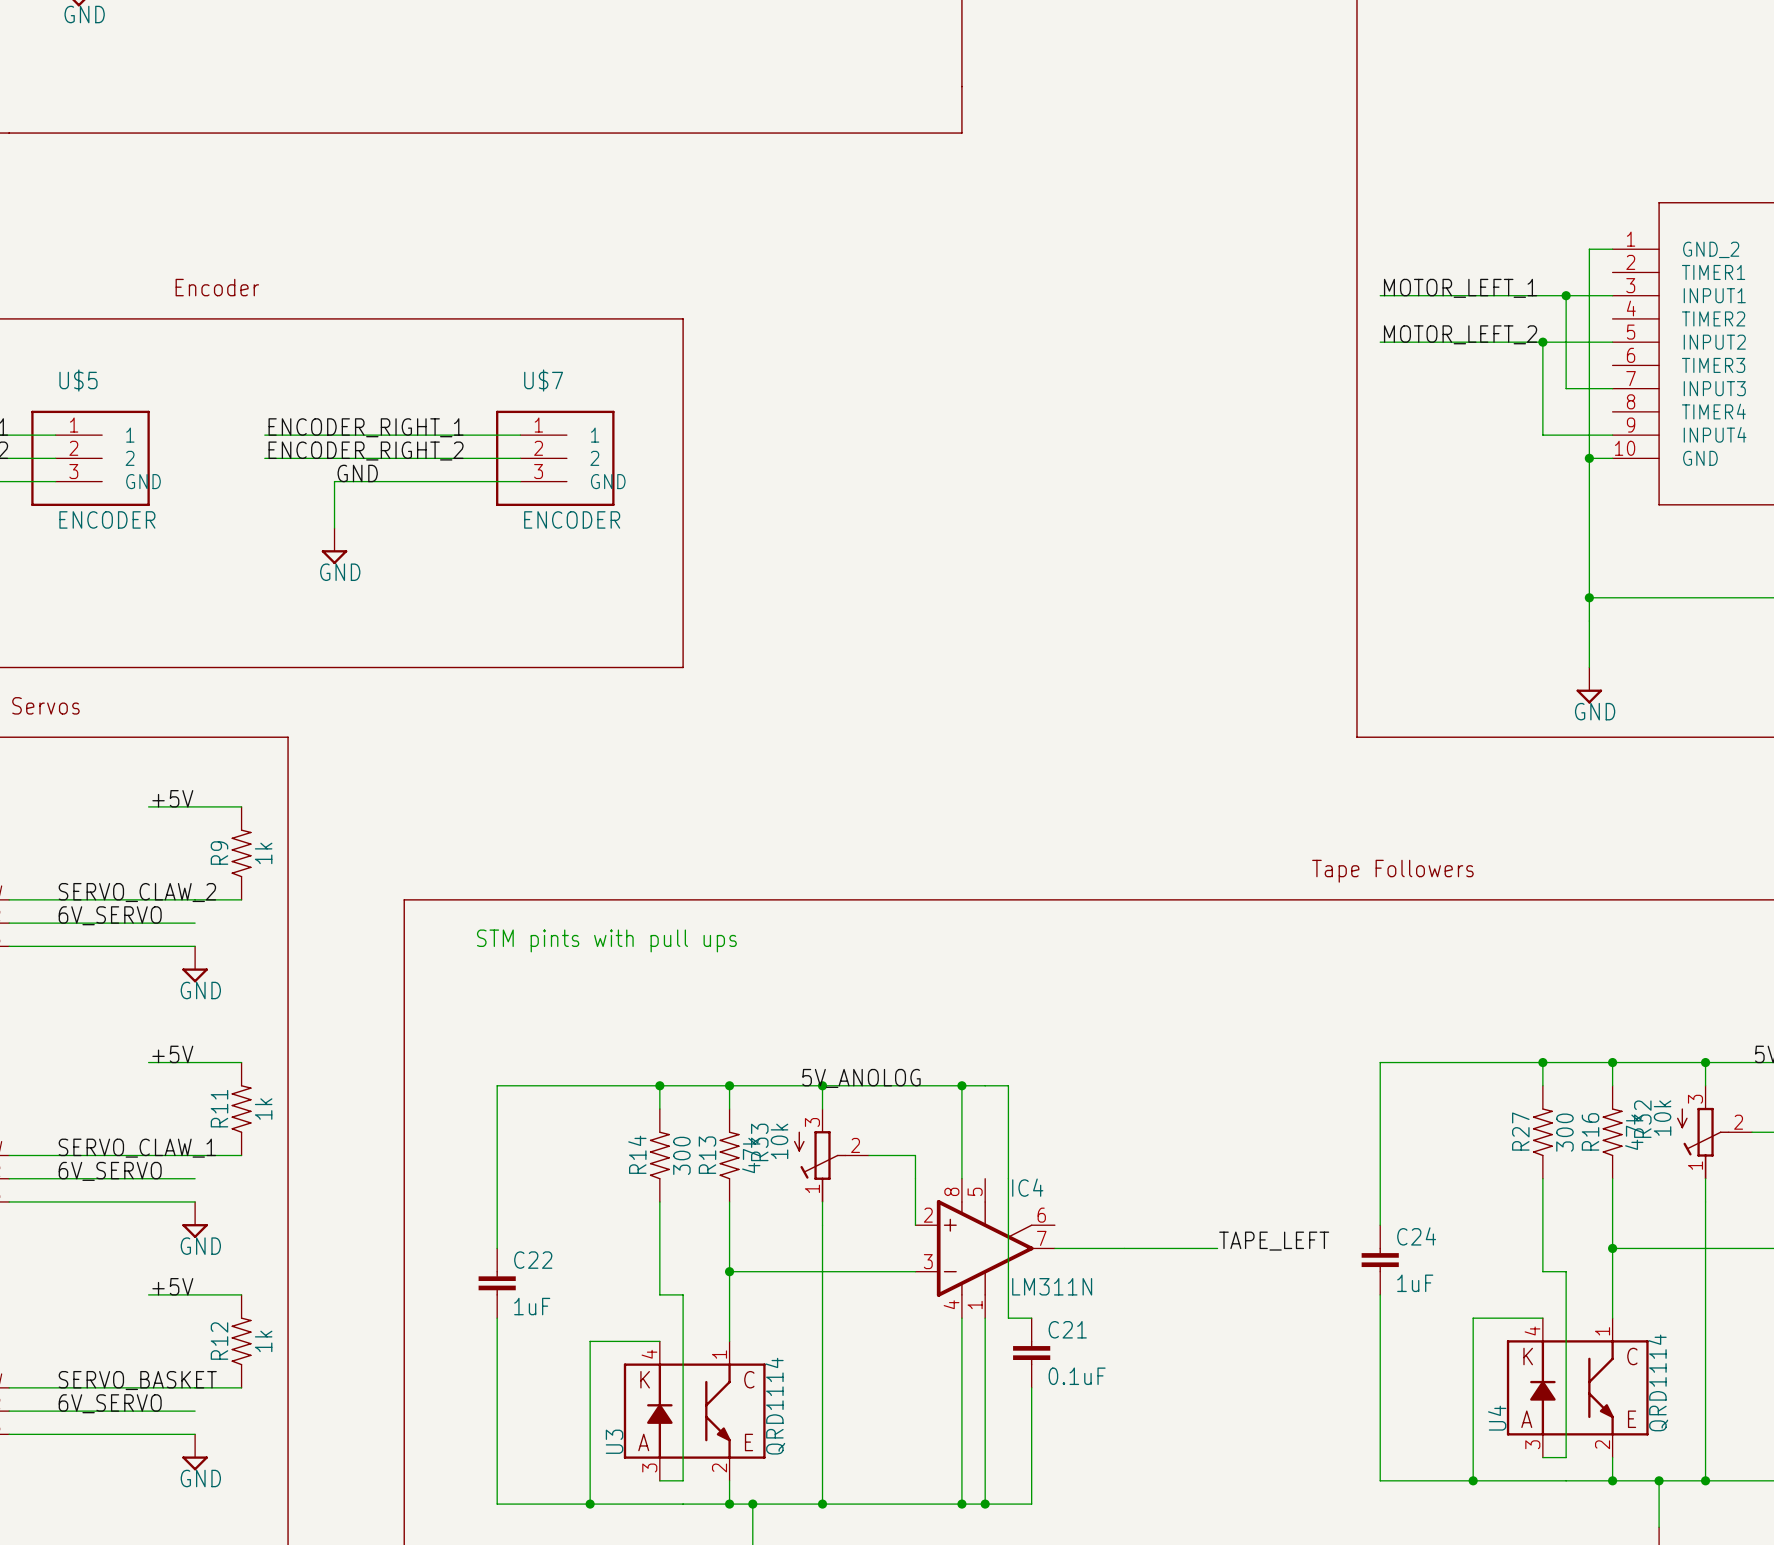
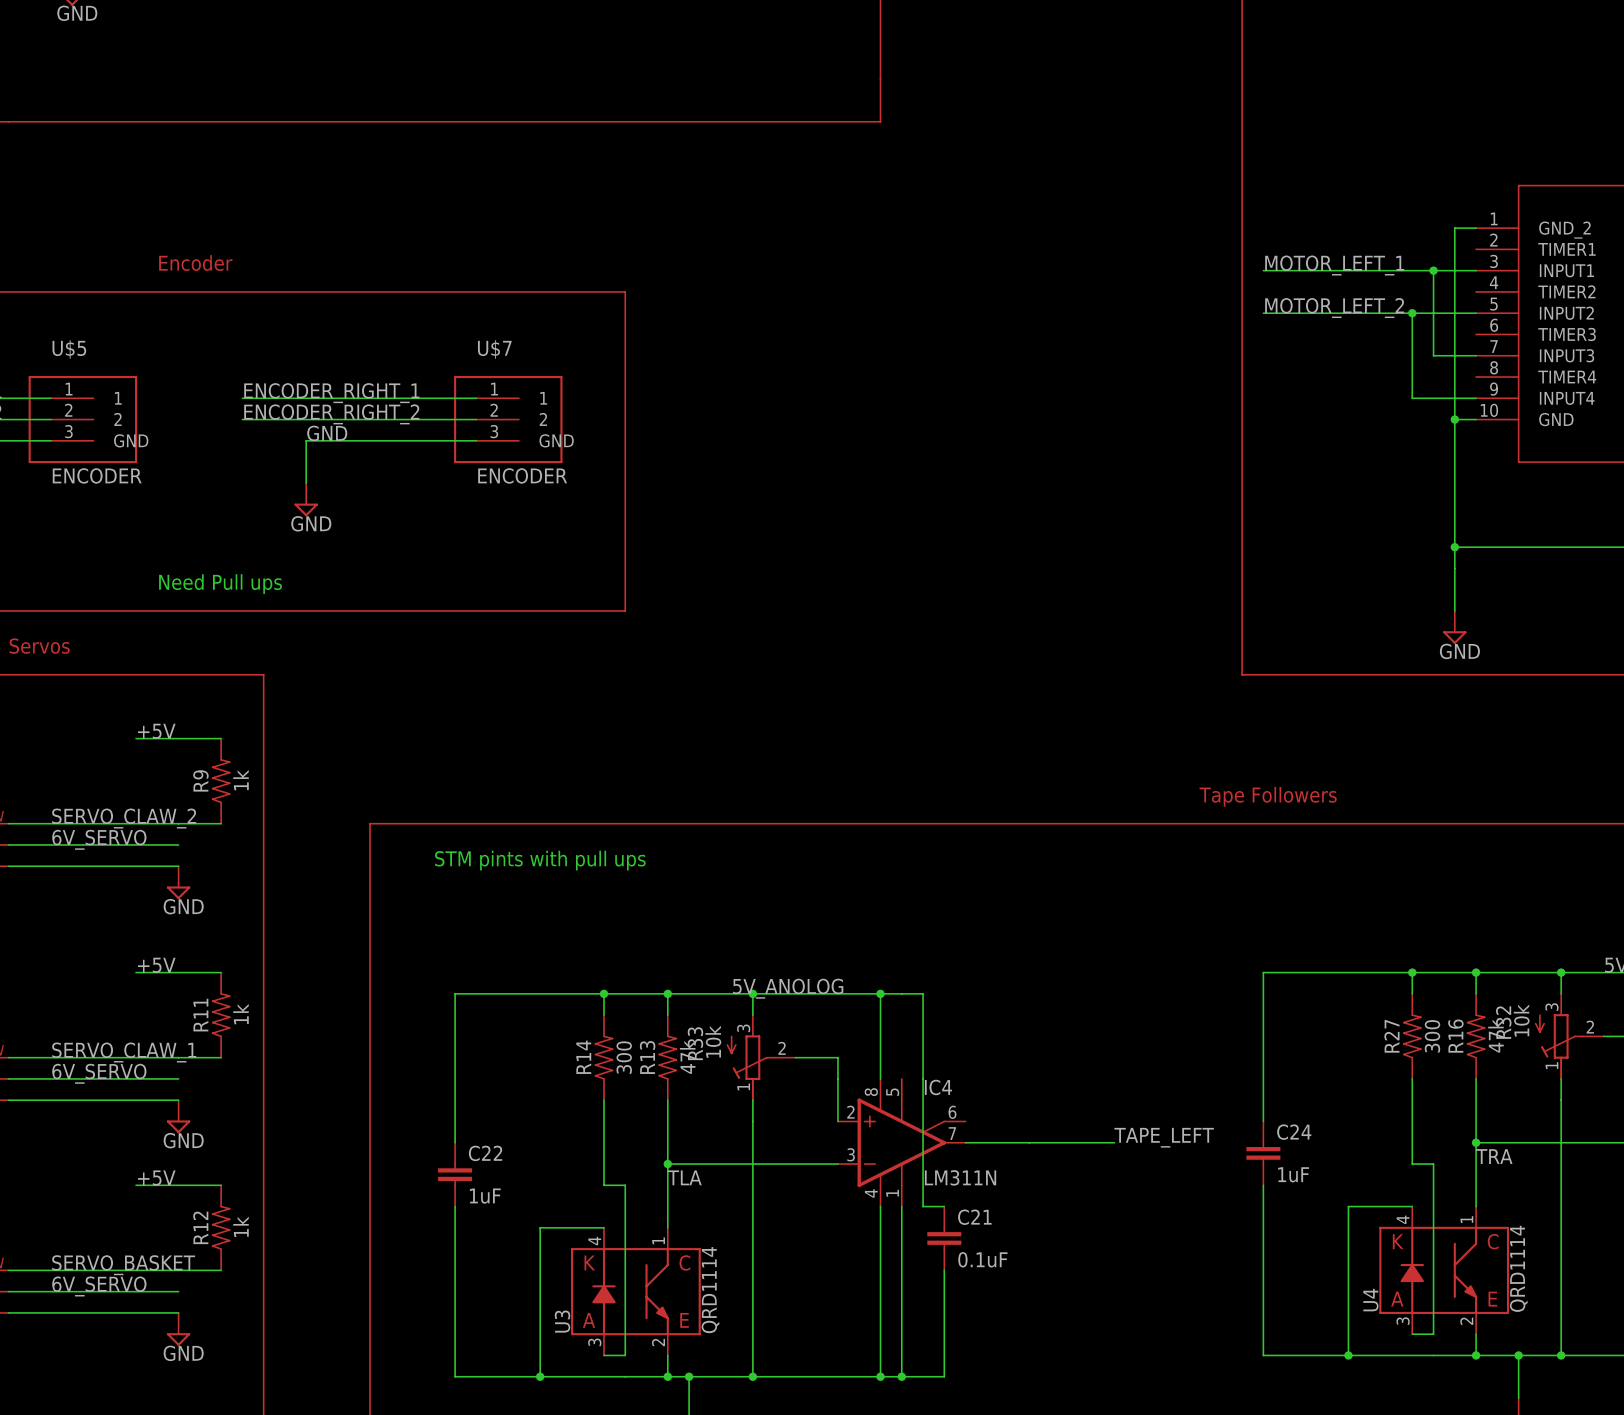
text: none -> Need Pull ups (220, 584)
label: none -> TRA (1494, 1156)
label: none -> TLA (684, 1177)

